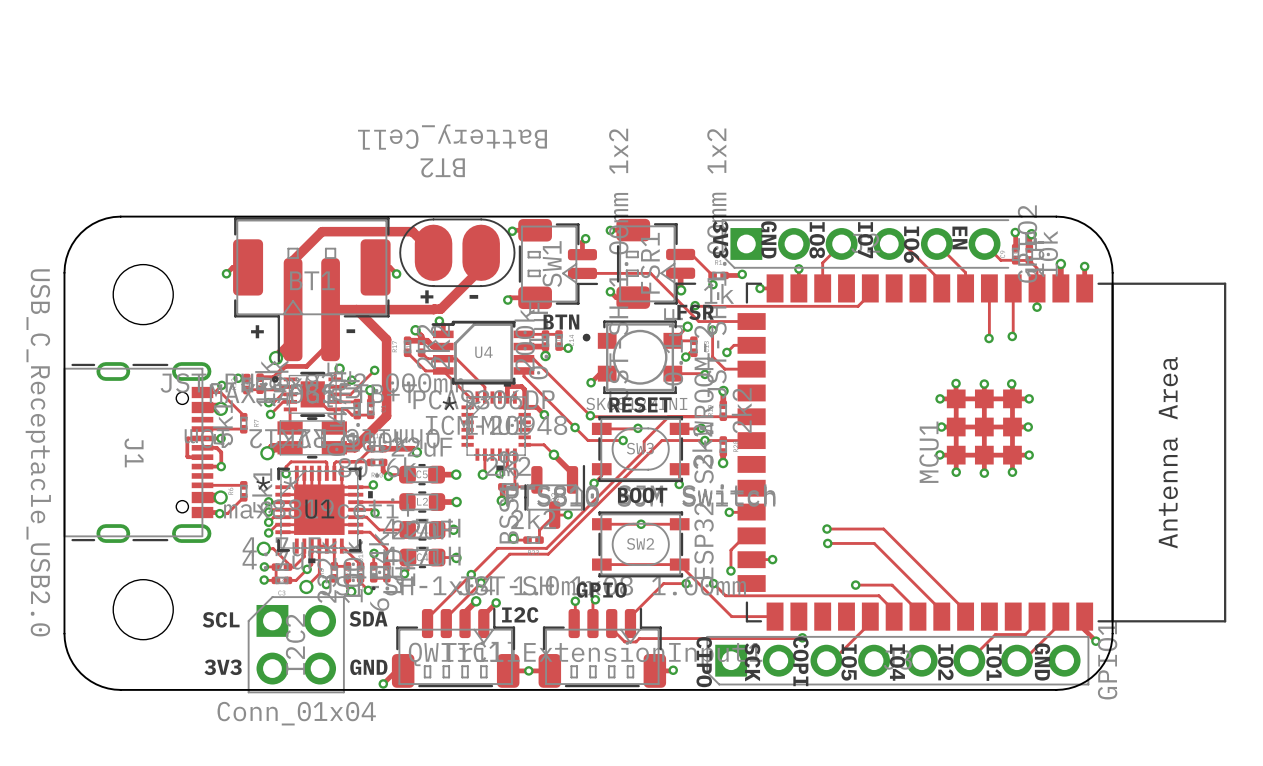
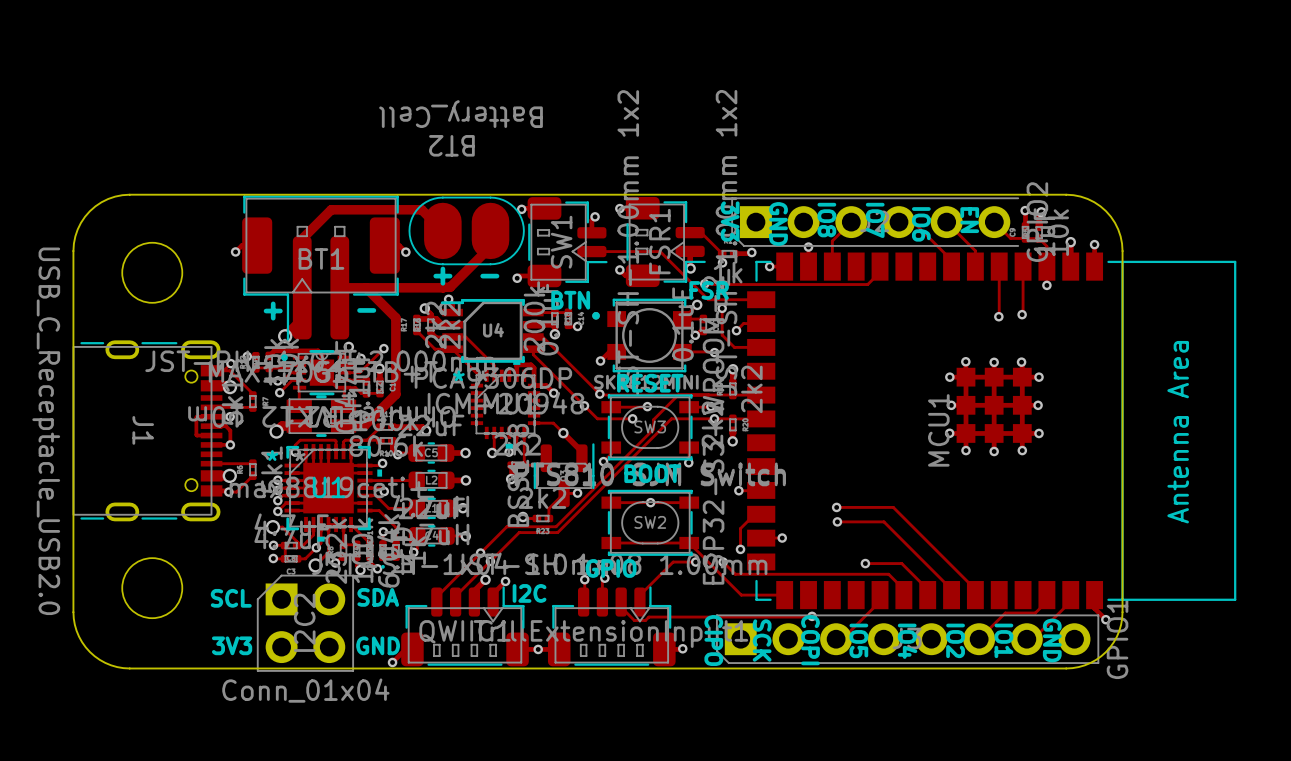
track: (330, 309) (330, 342) (306, 366) (285, 366) (273, 377) (260, 377) -> (321, 372) (321, 354) (318, 350) (274, 350) (269, 355)

